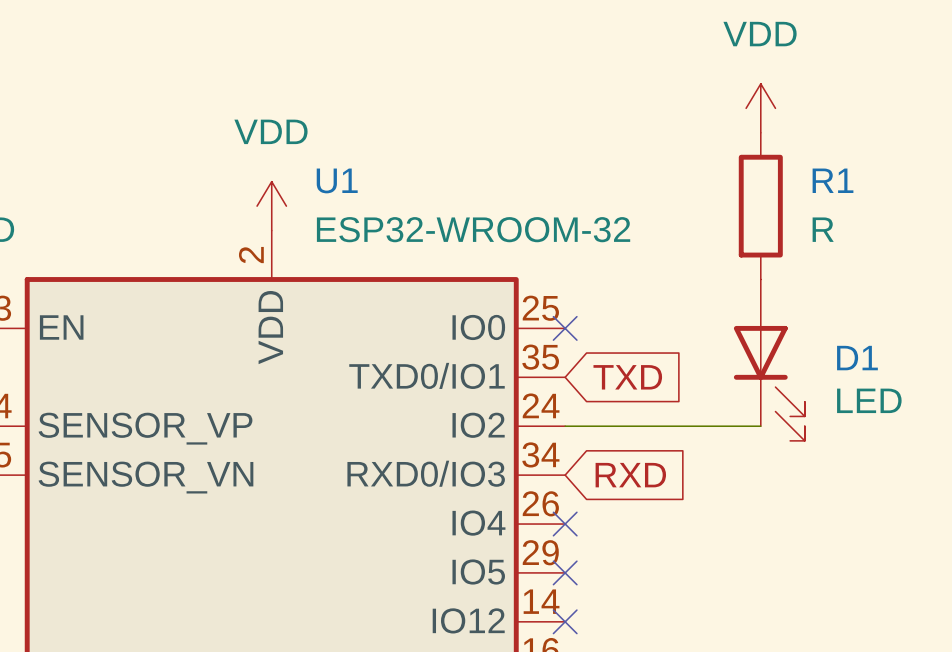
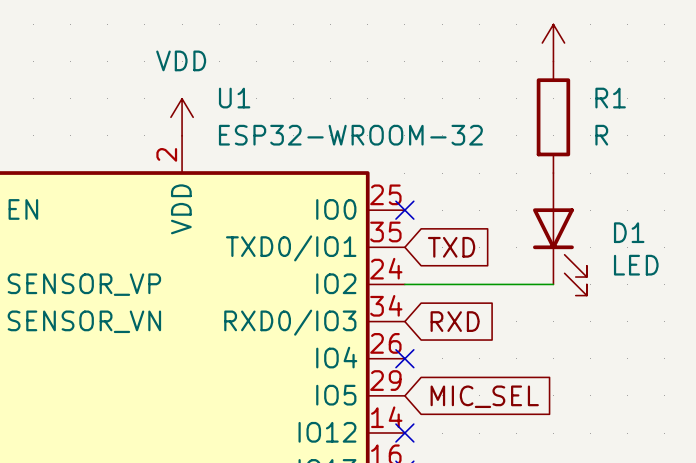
no-connect mark: (565, 572) -> none
global label: none -> MIC_SEL (484, 396)

